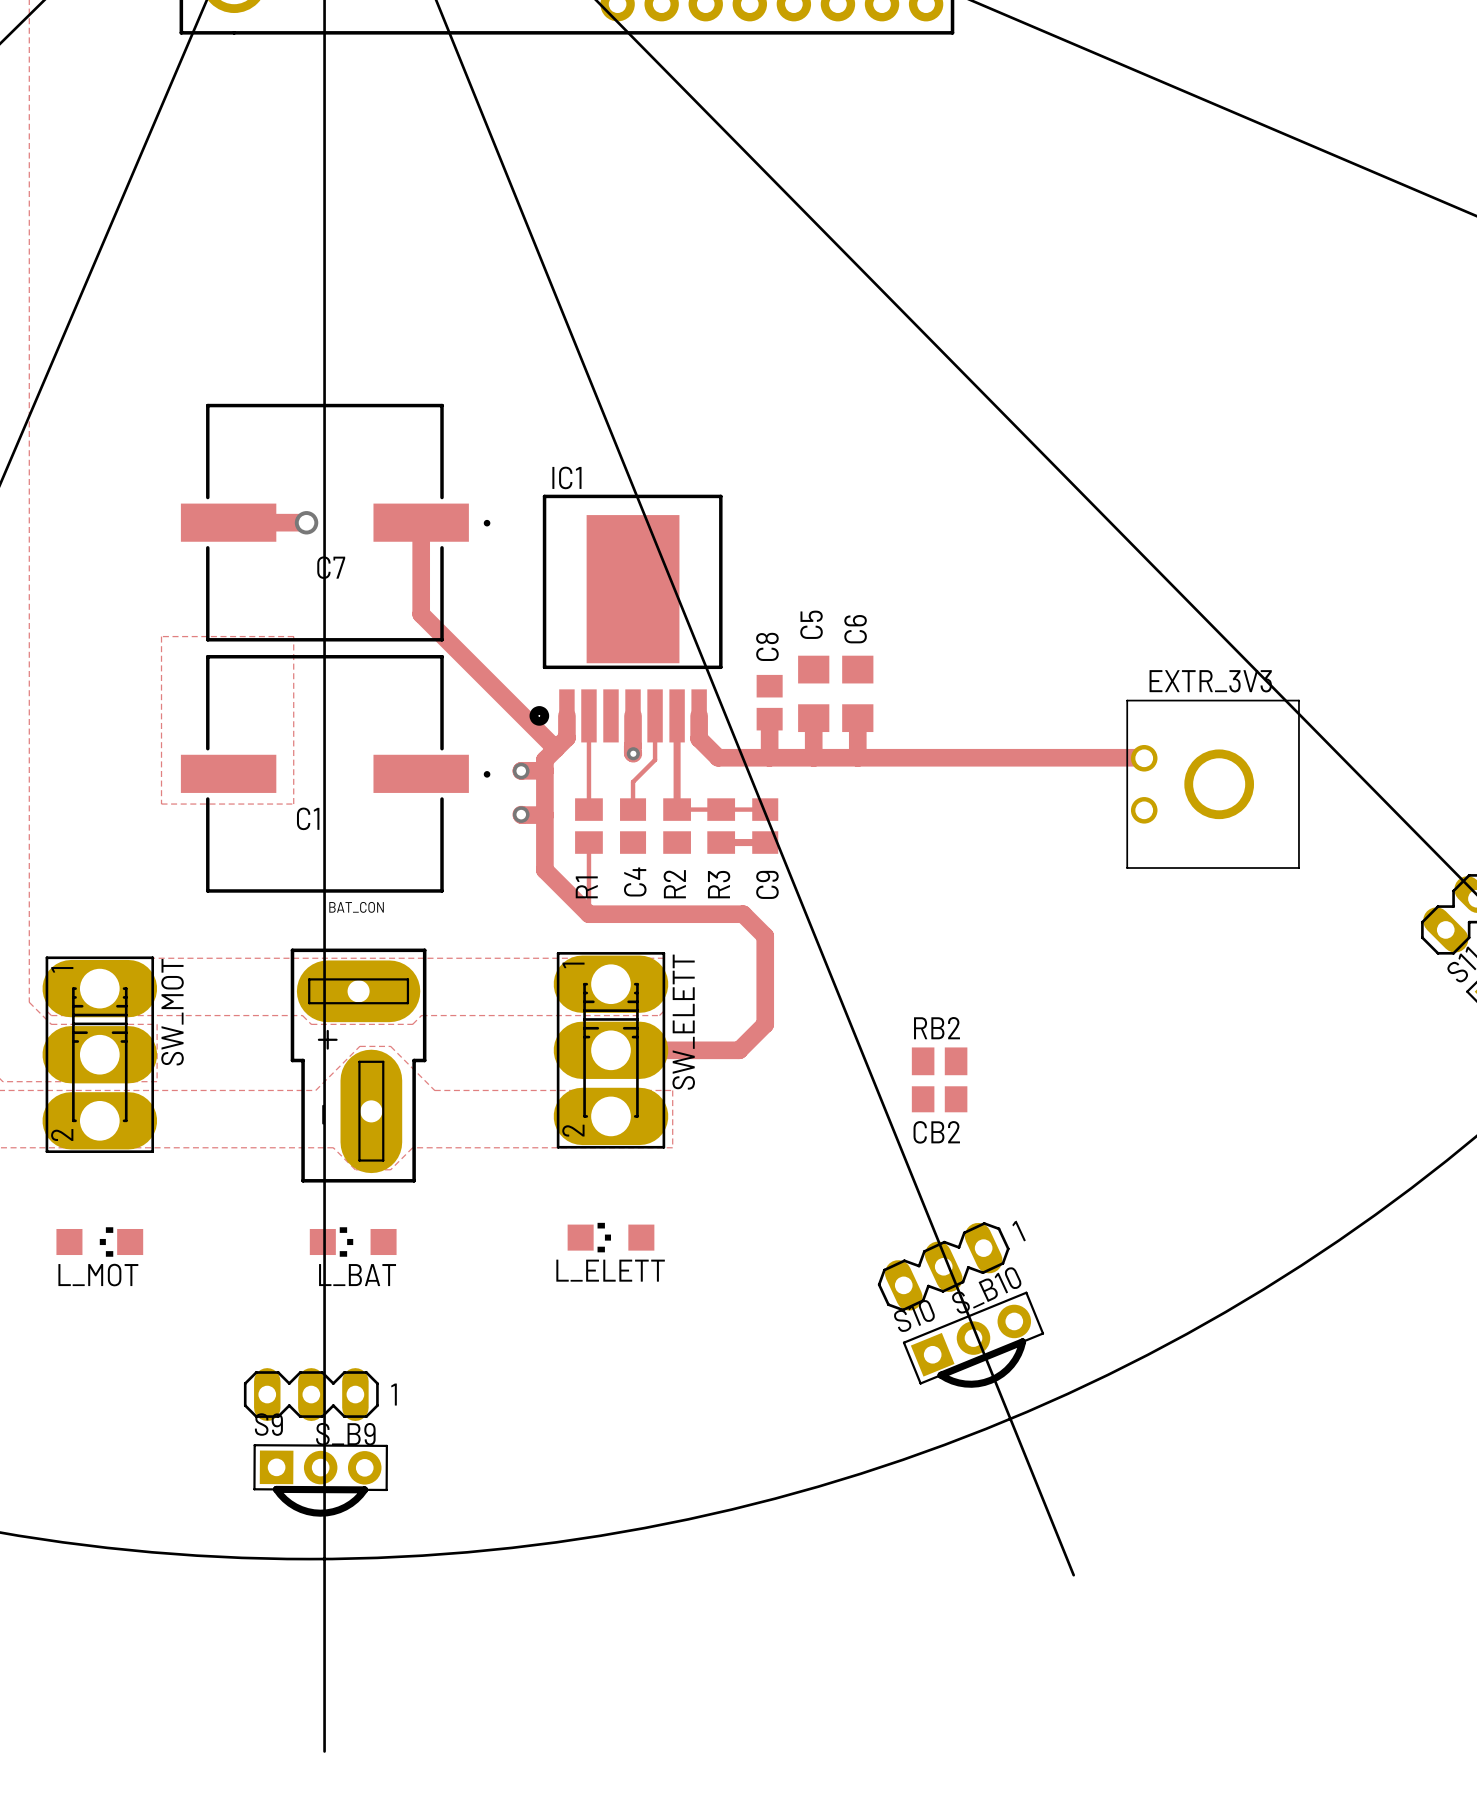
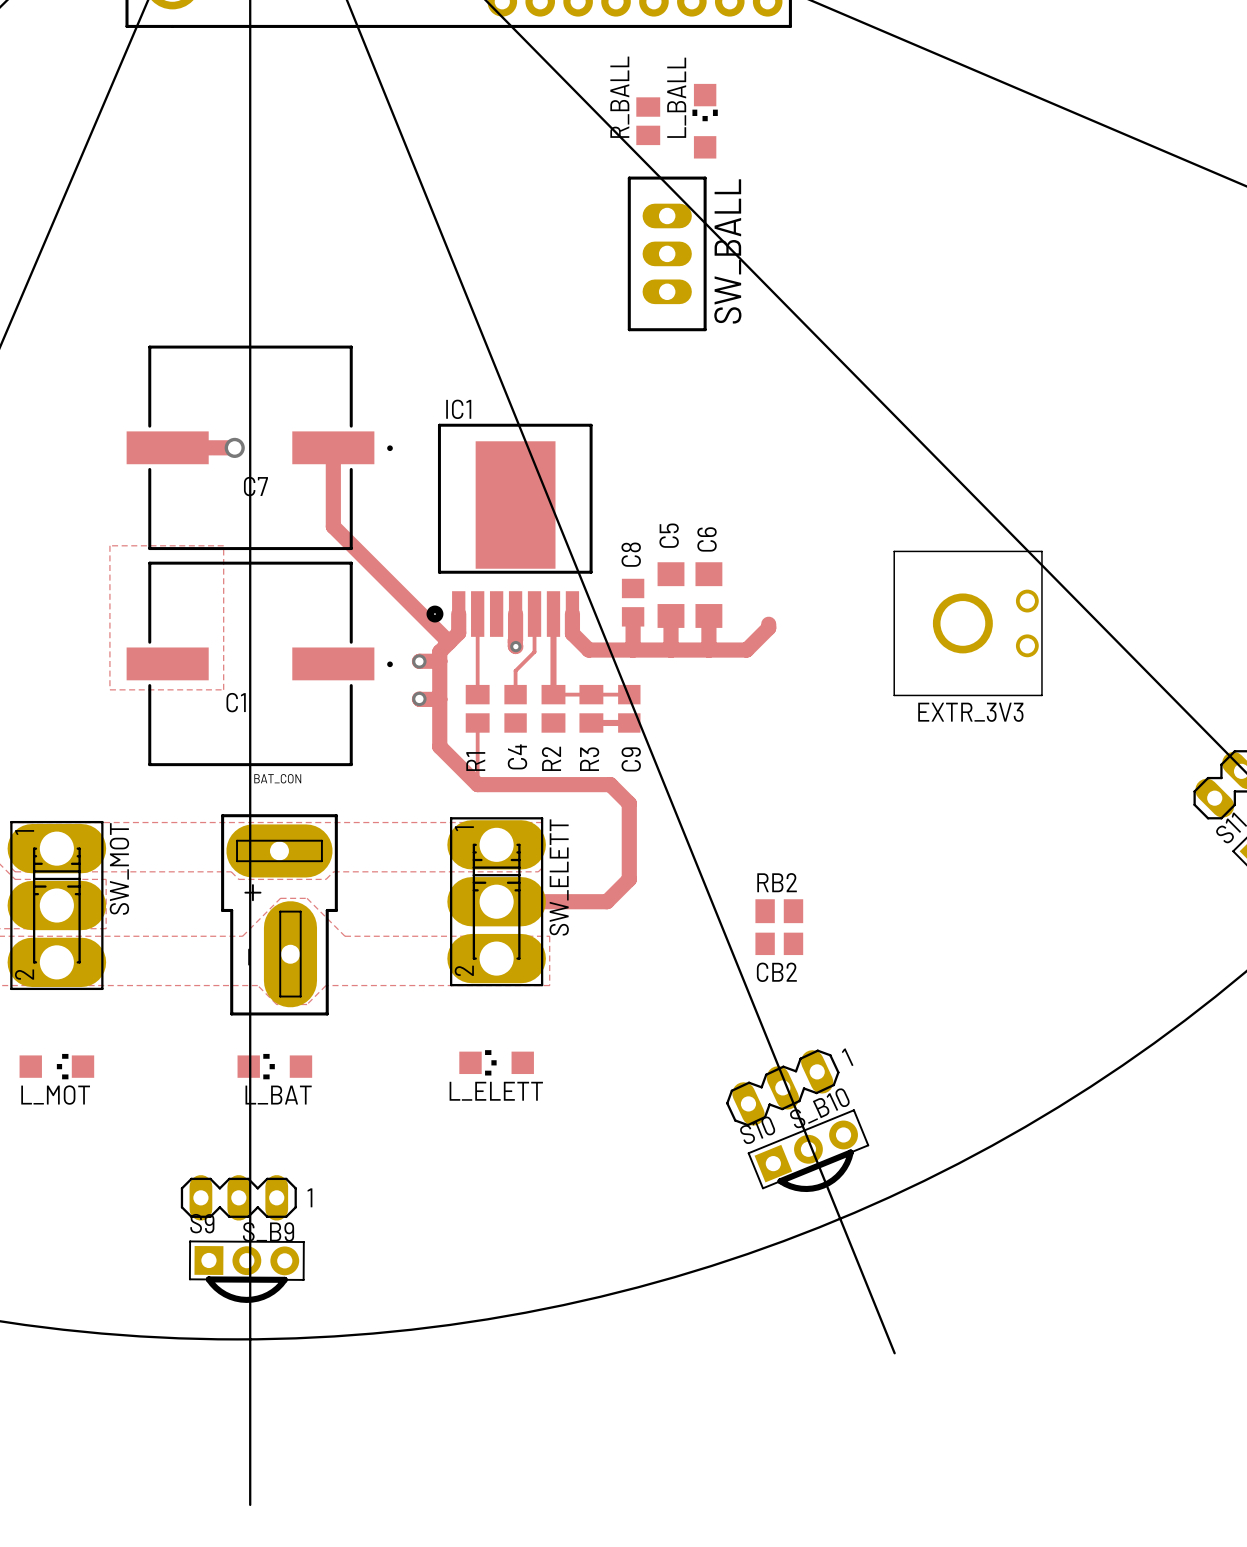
R_BALL: none -> (648, 121)
L_BALL: none -> (705, 121)
SW_BALL: none -> (667, 253)
track: (901, 757) (1144, 758) -> (746, 650) (768, 628) (768, 624)
EXTR_3V3 rotation: 0° (1213, 784) -> 180° (968, 623)

